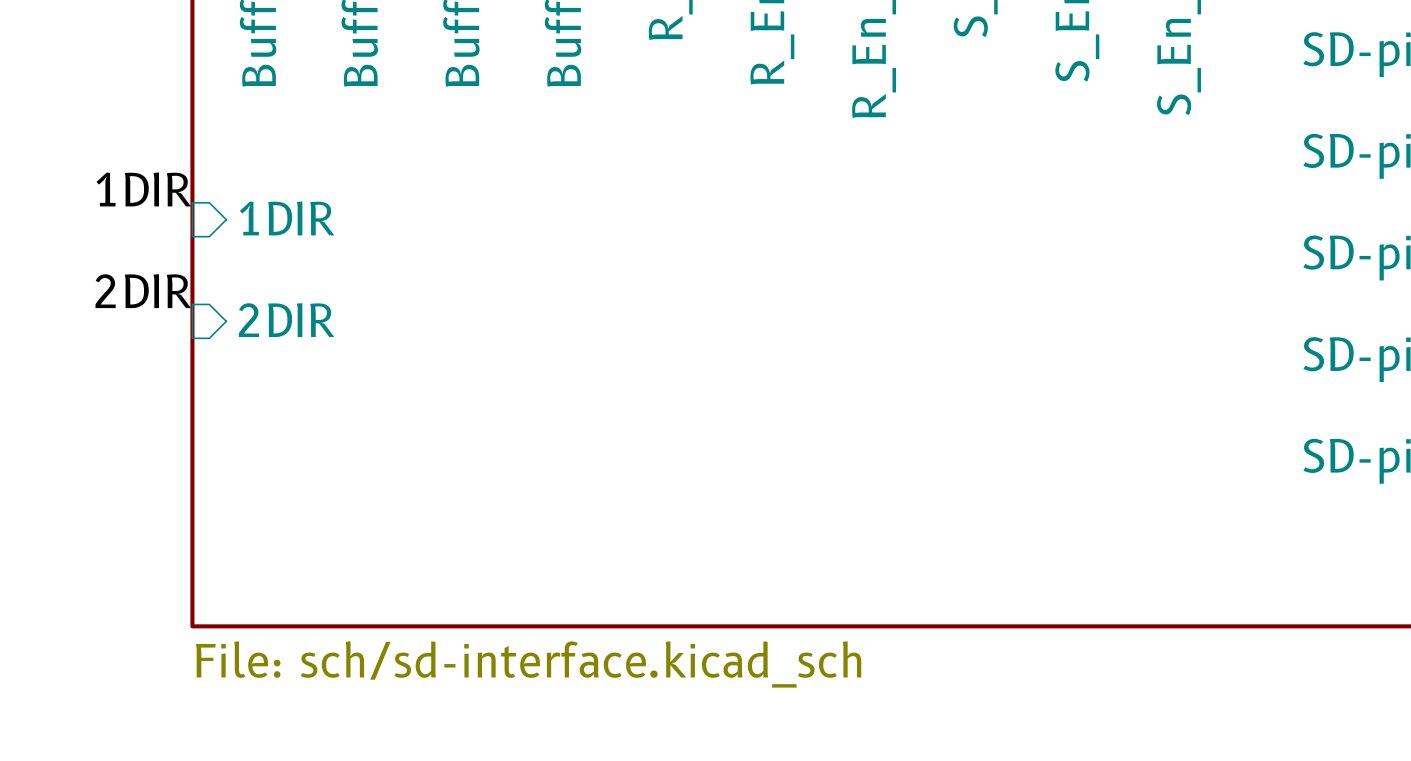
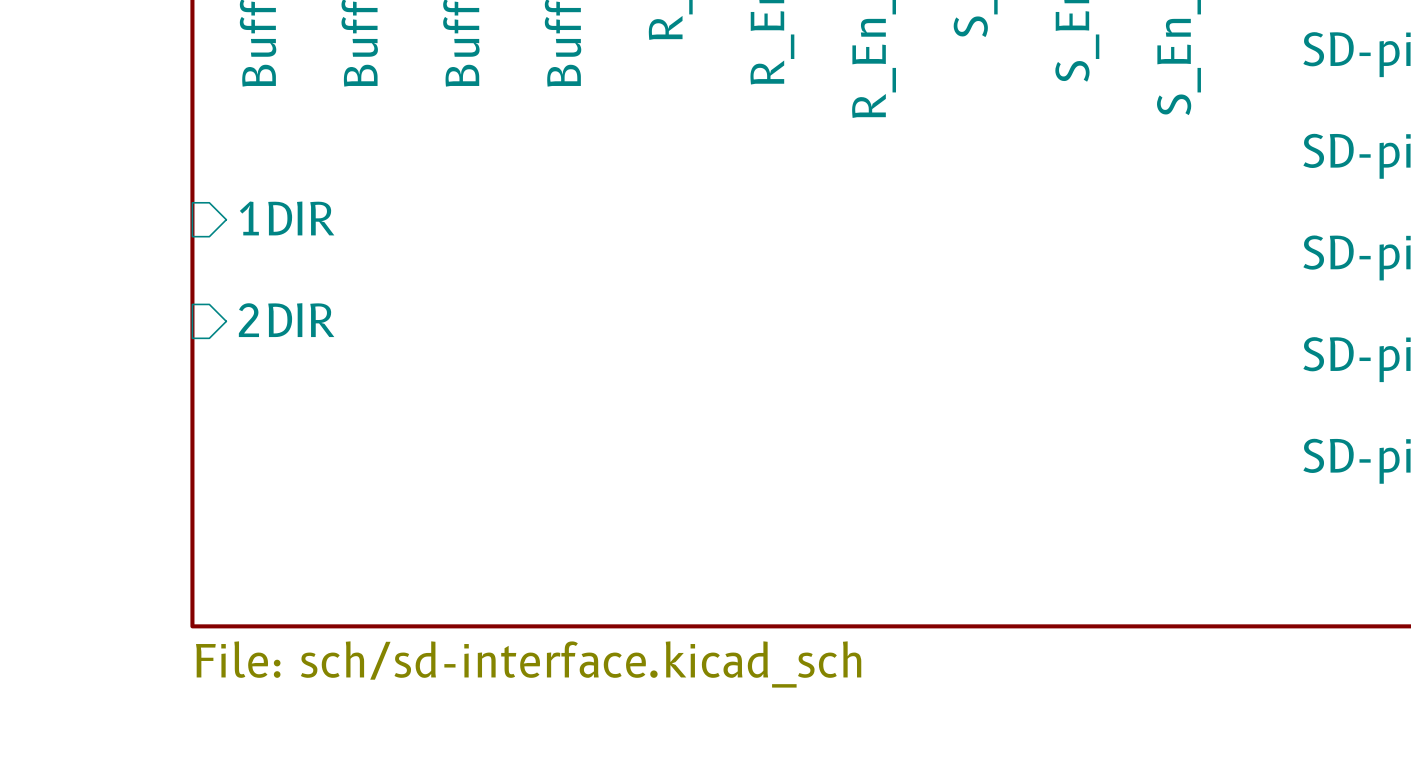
label: 1DIR (143, 189) -> none
label: 2DIR (143, 291) -> none

